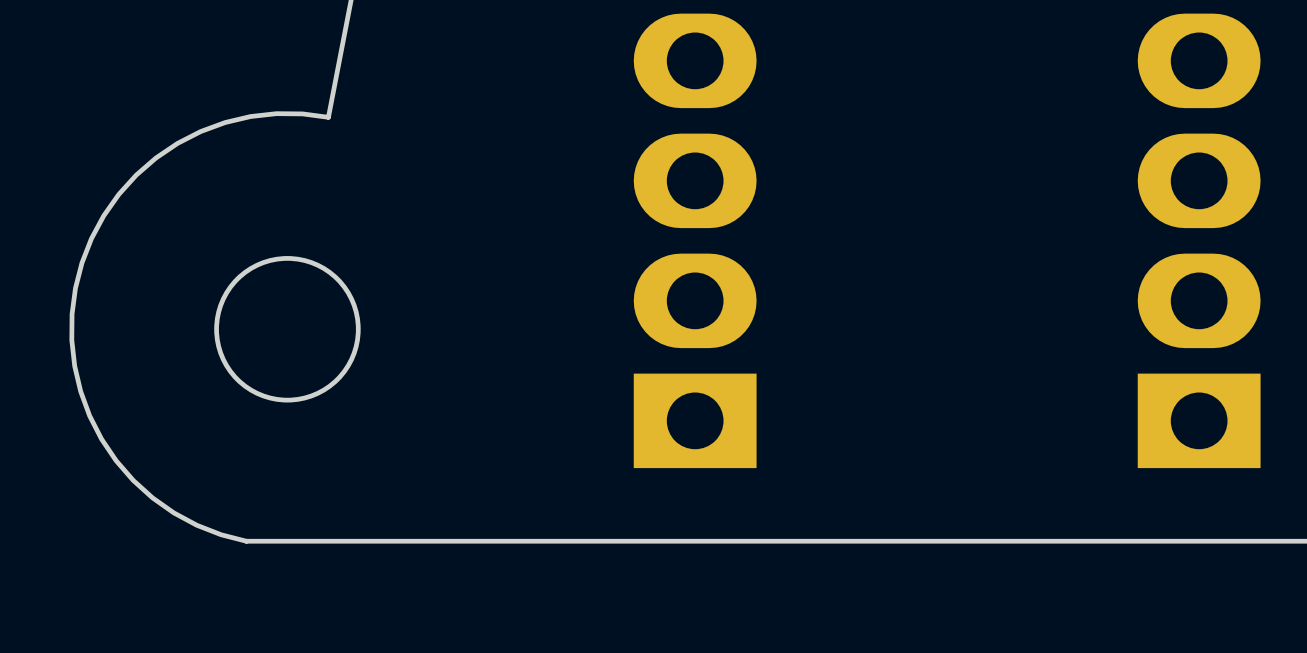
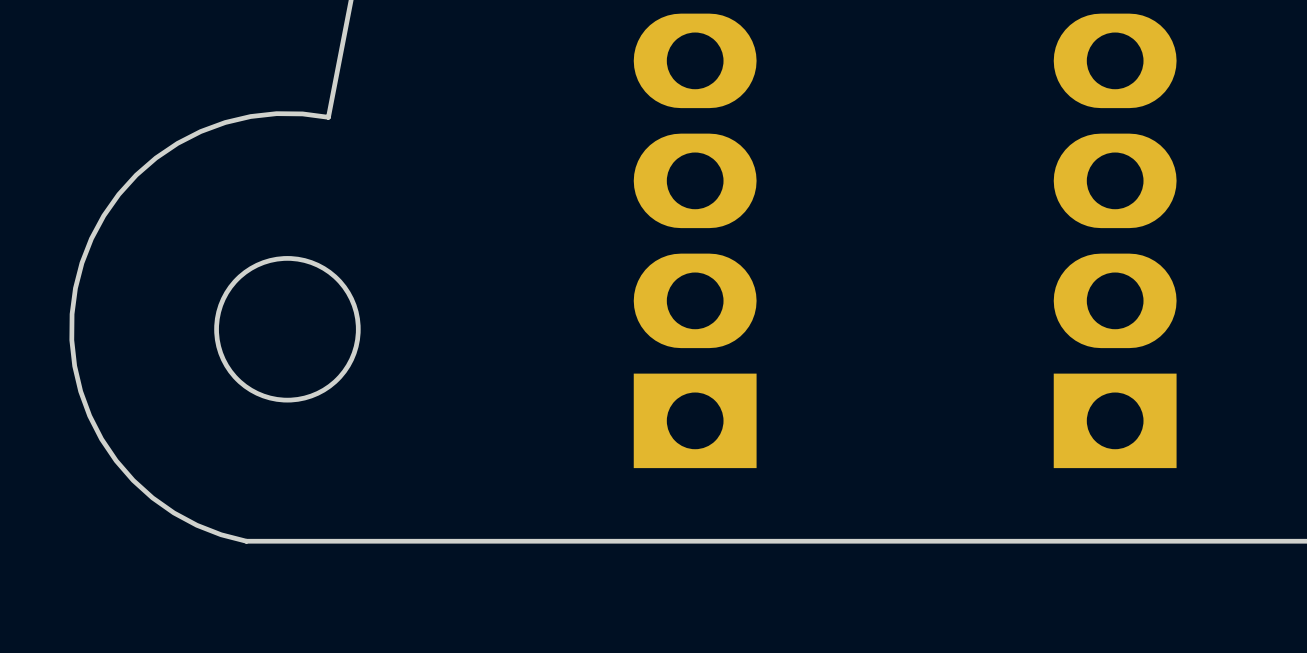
part position: (1199, 240) -> (1115, 240)

